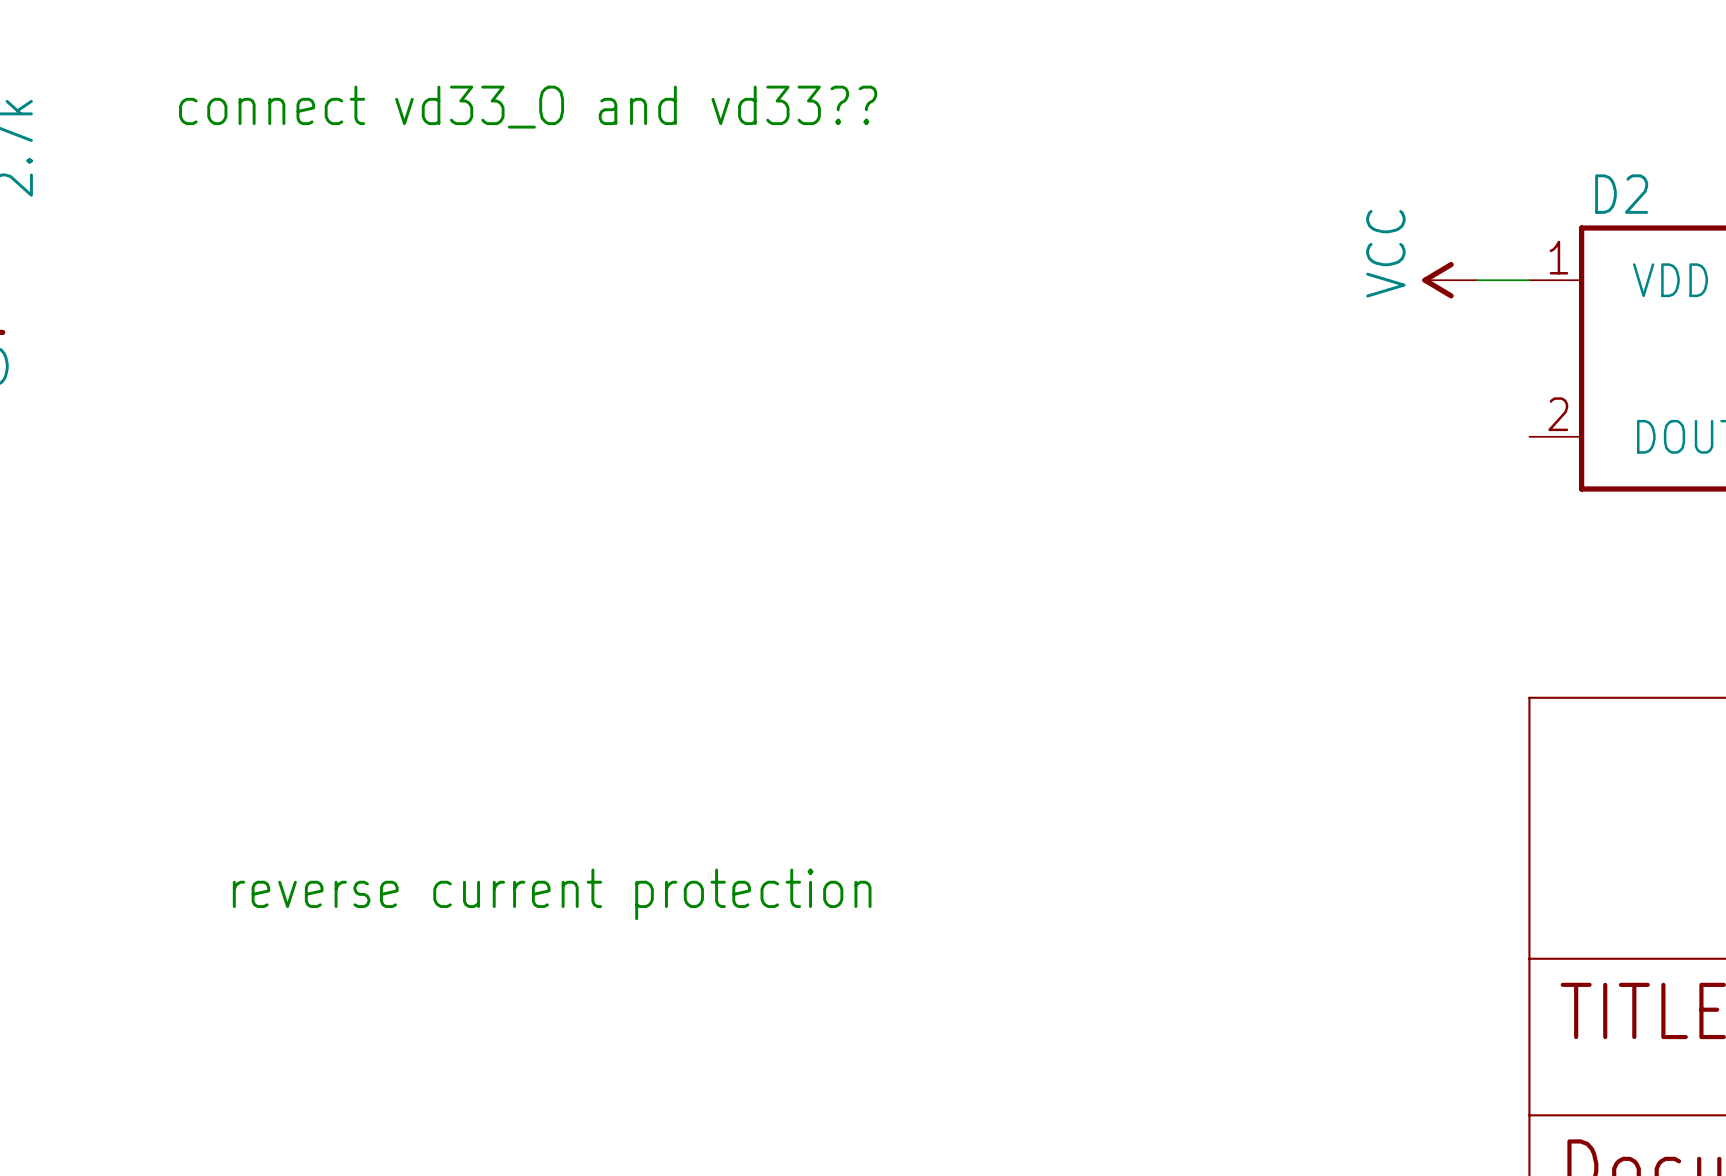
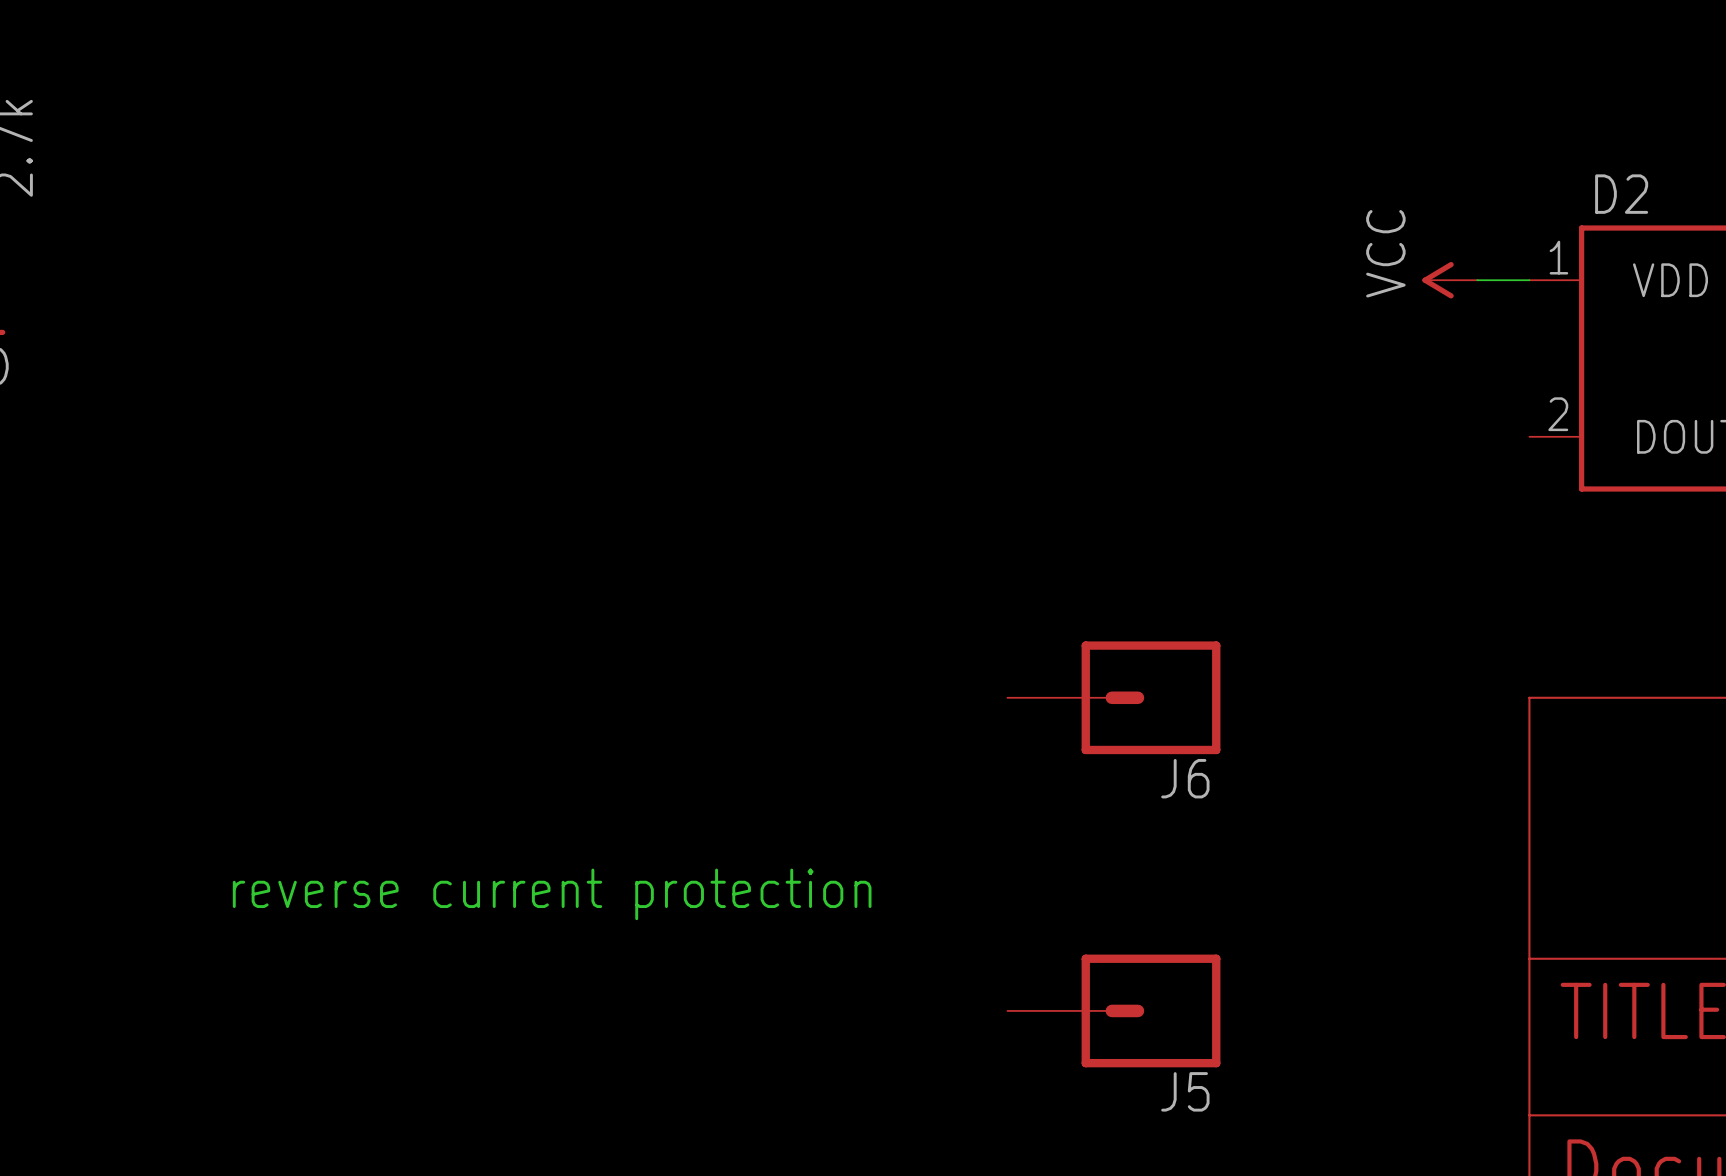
text: connect vd33_O and vd33?? (528, 107) -> none
J6: none -> (1113, 697)
J5: none -> (1113, 1010)

